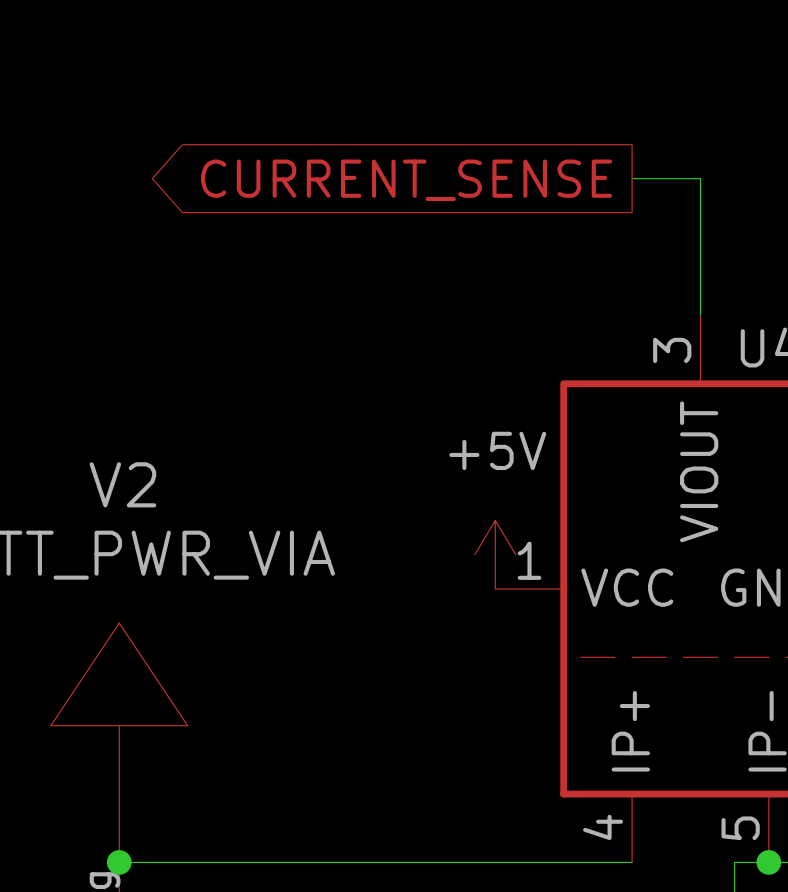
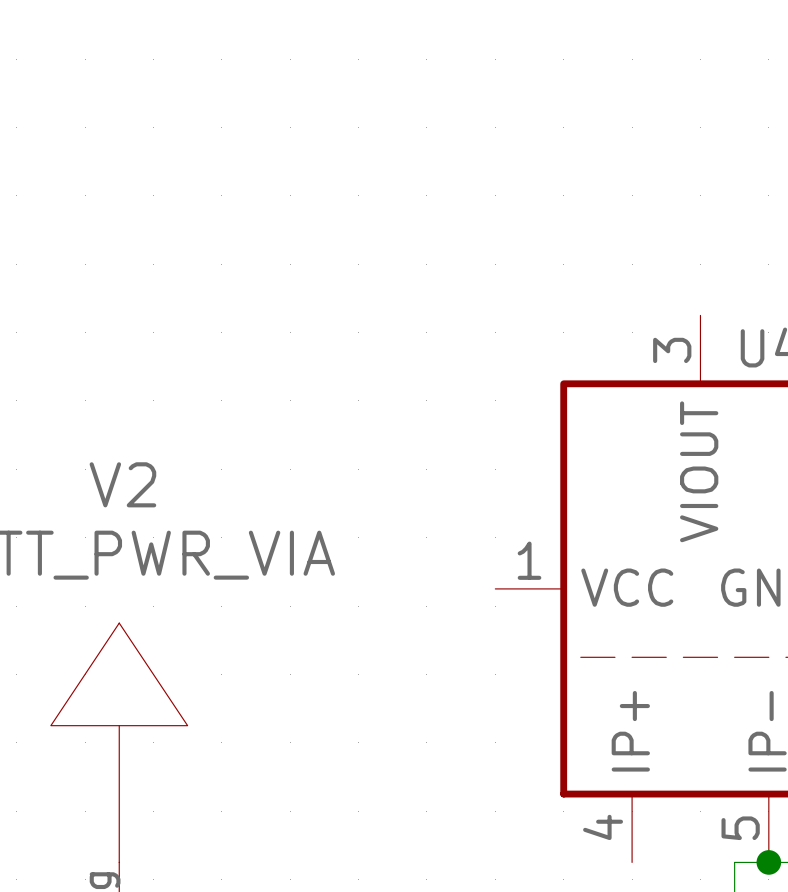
wire: (632, 178) (700, 178) (700, 315) -> none
global label: CURRENT_SENSE (406, 180) -> none
power symbol: +5V (495, 554) -> none
wire: (119, 862) (632, 862) -> none
junction: (119, 862) -> none

